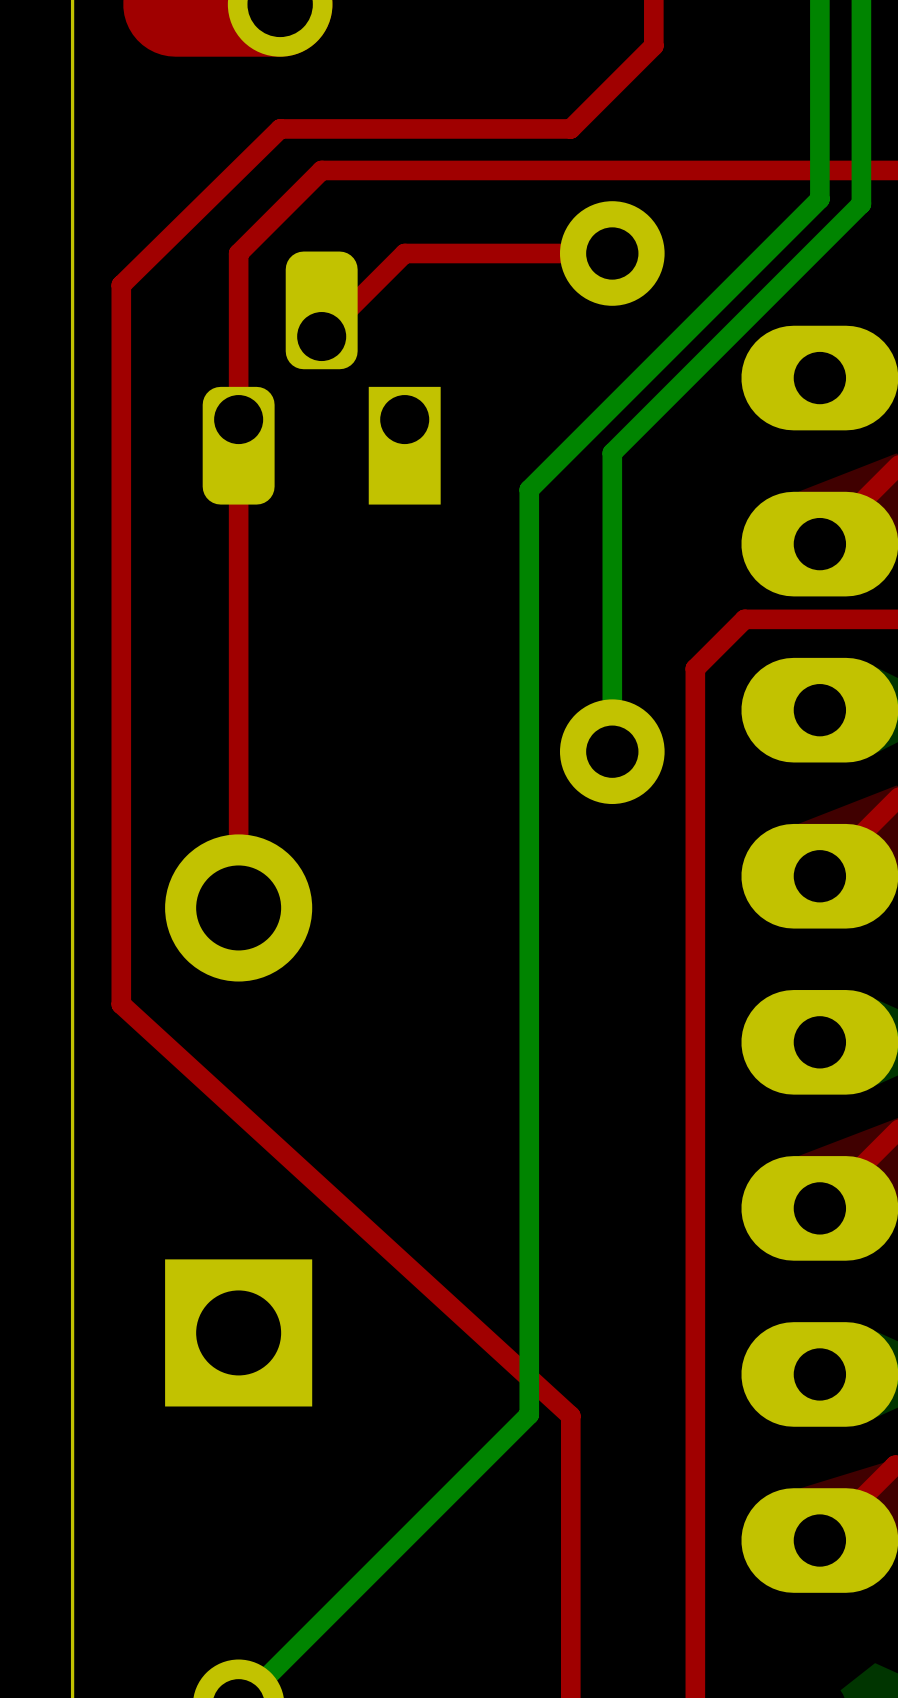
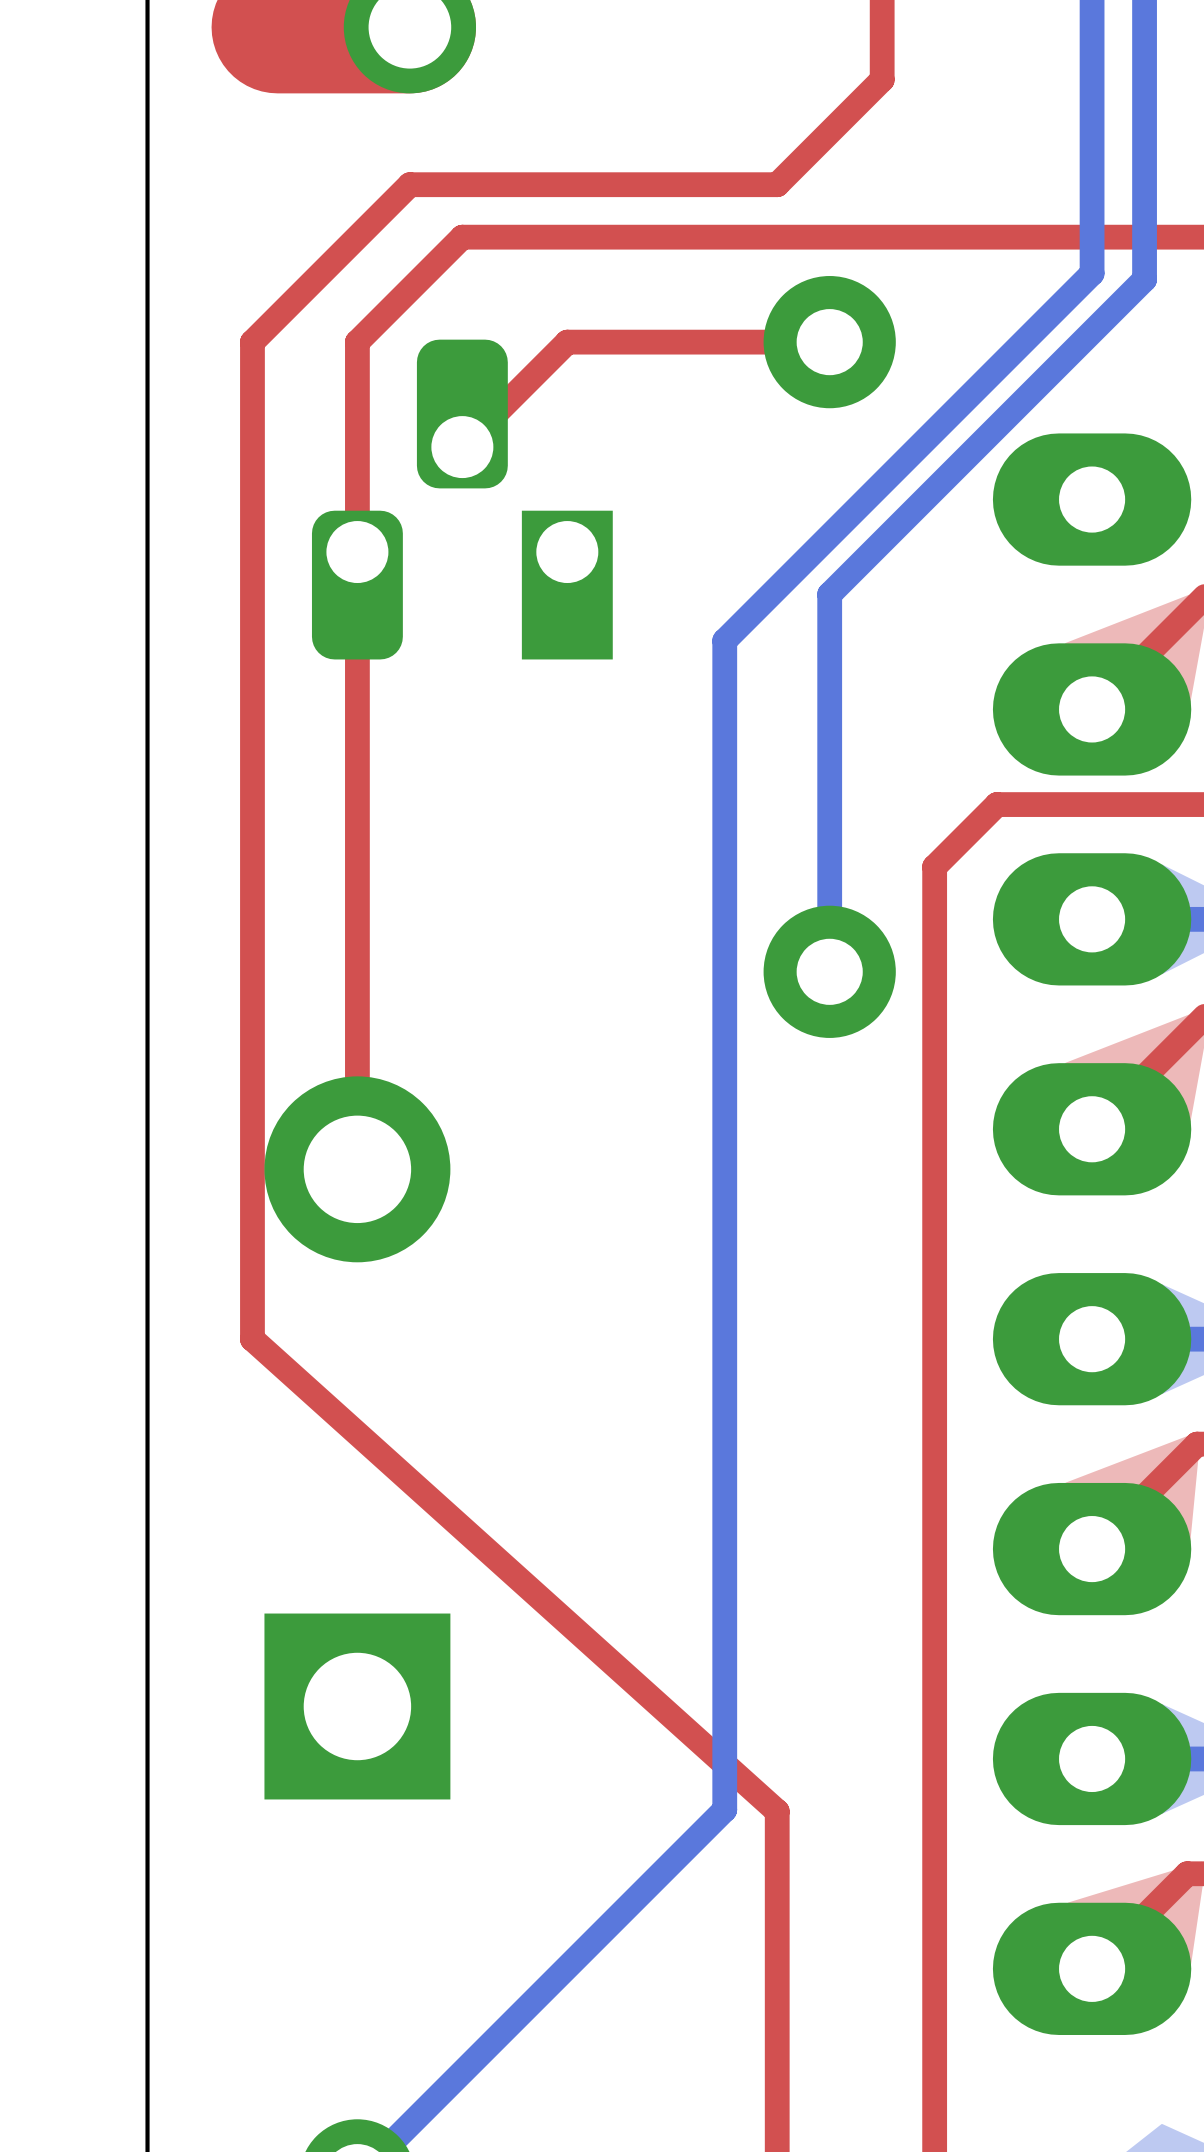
top track: (280, 128) (121, 285) (121, 1004) (570, 1415) -> (409, 184) (252, 342) (252, 1339) (777, 1811)

